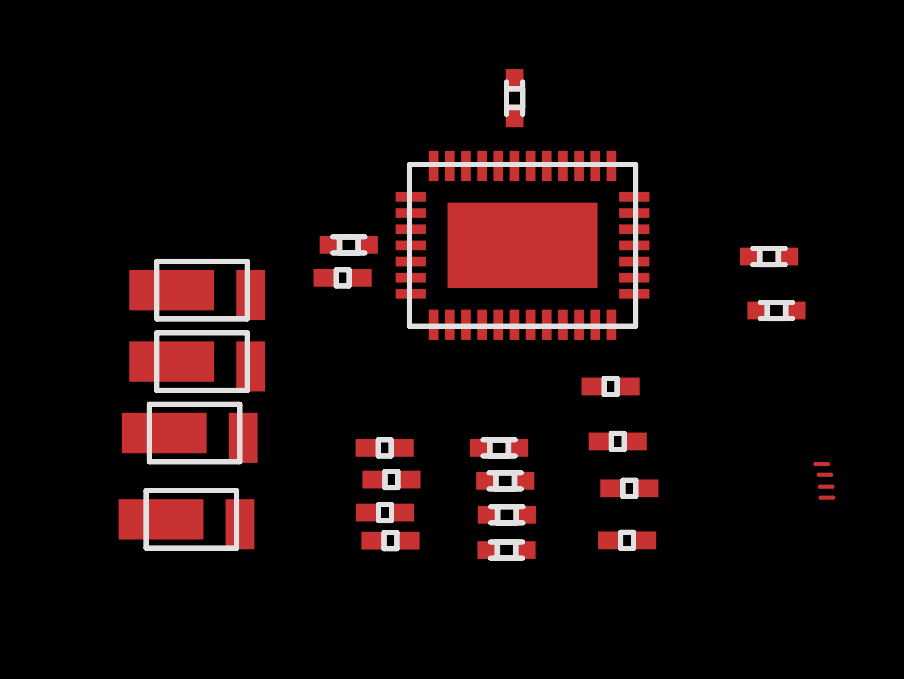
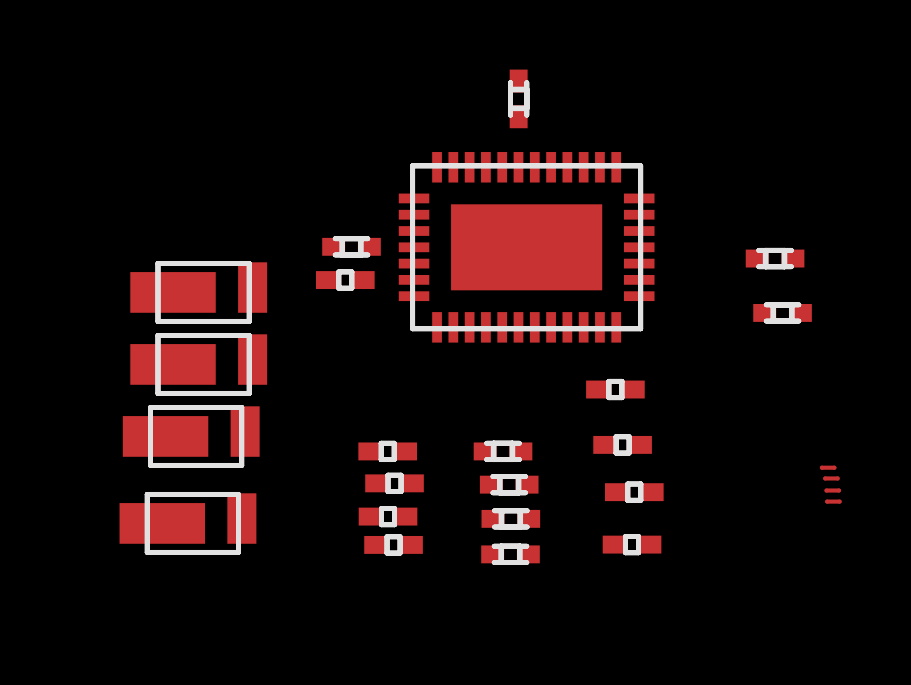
part footprint: [129, 258, 266, 322] -> [130, 260, 268, 324]
part footprint: [129, 330, 266, 393] -> [130, 332, 268, 396]
part footprint: [121, 401, 258, 465] -> [122, 404, 260, 468]
part footprint: [118, 488, 255, 551] -> [119, 491, 257, 555]

